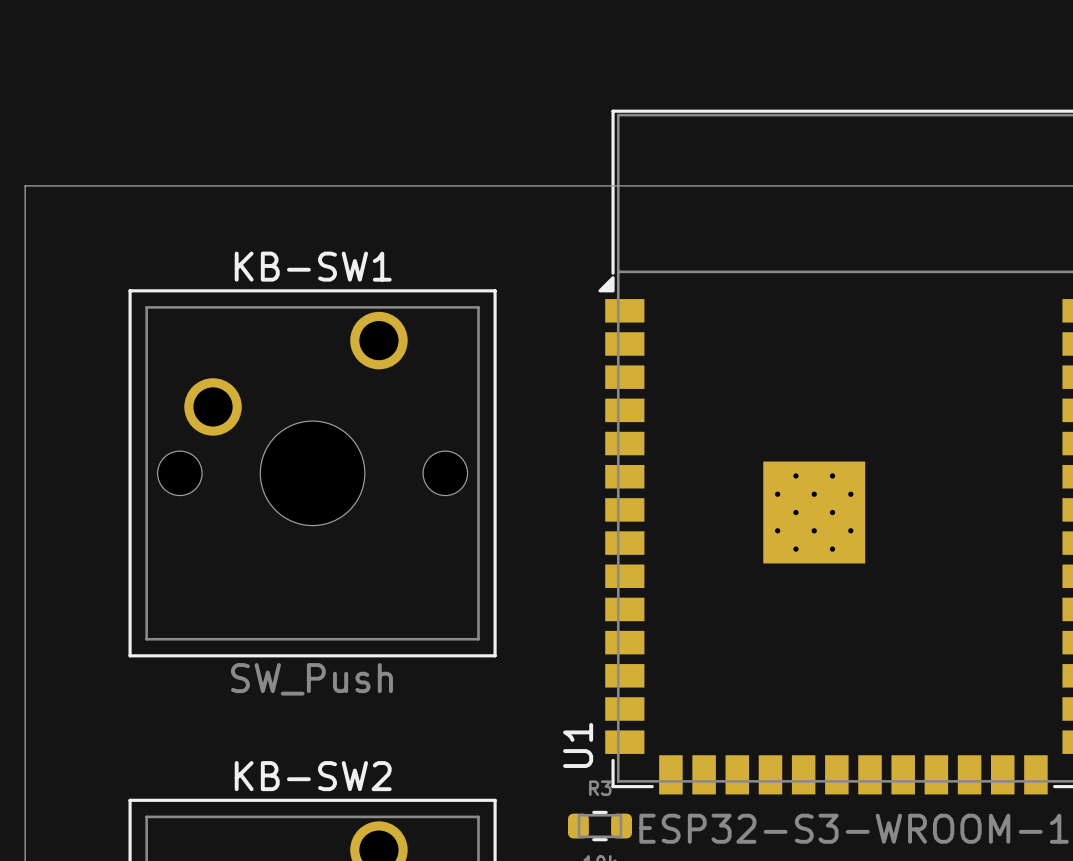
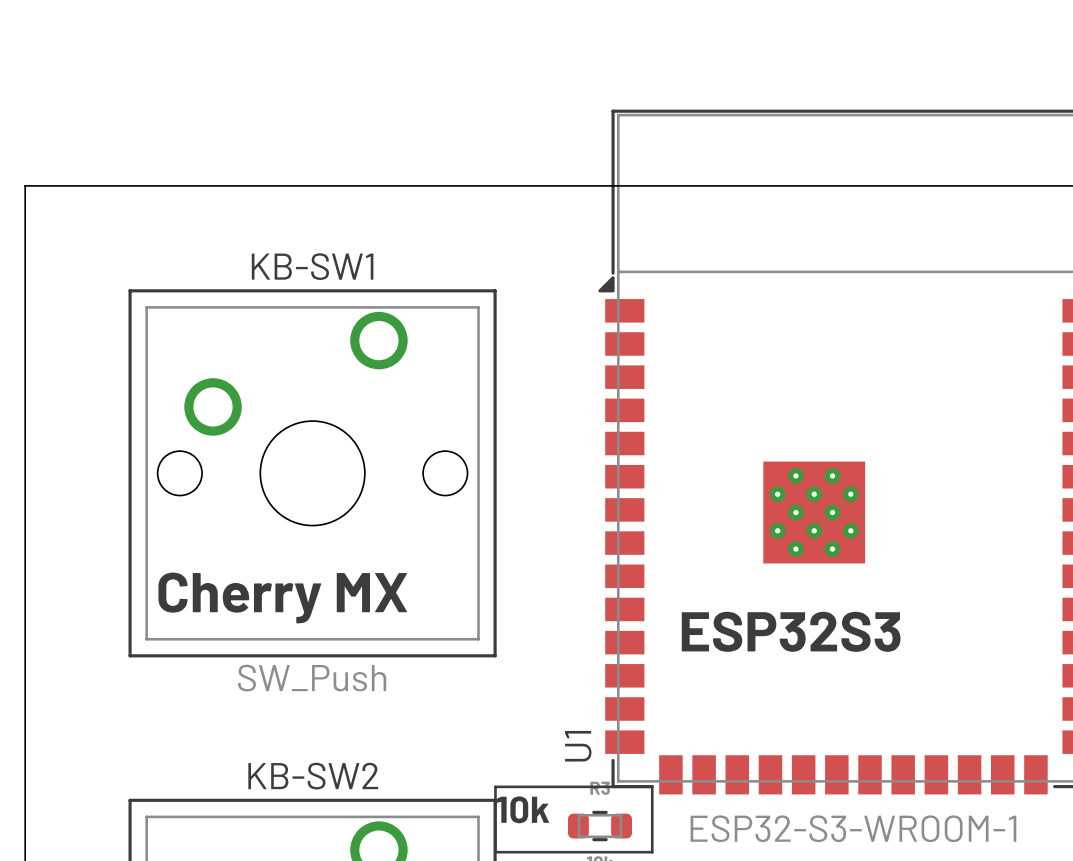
text: none -> Cherry MX (282, 597)
text: none -> ESP32S3 (791, 631)
line: none -> (495, 786) (652, 786) (652, 852) (495, 852) (495, 786)
text: none -> 10k (522, 809)

